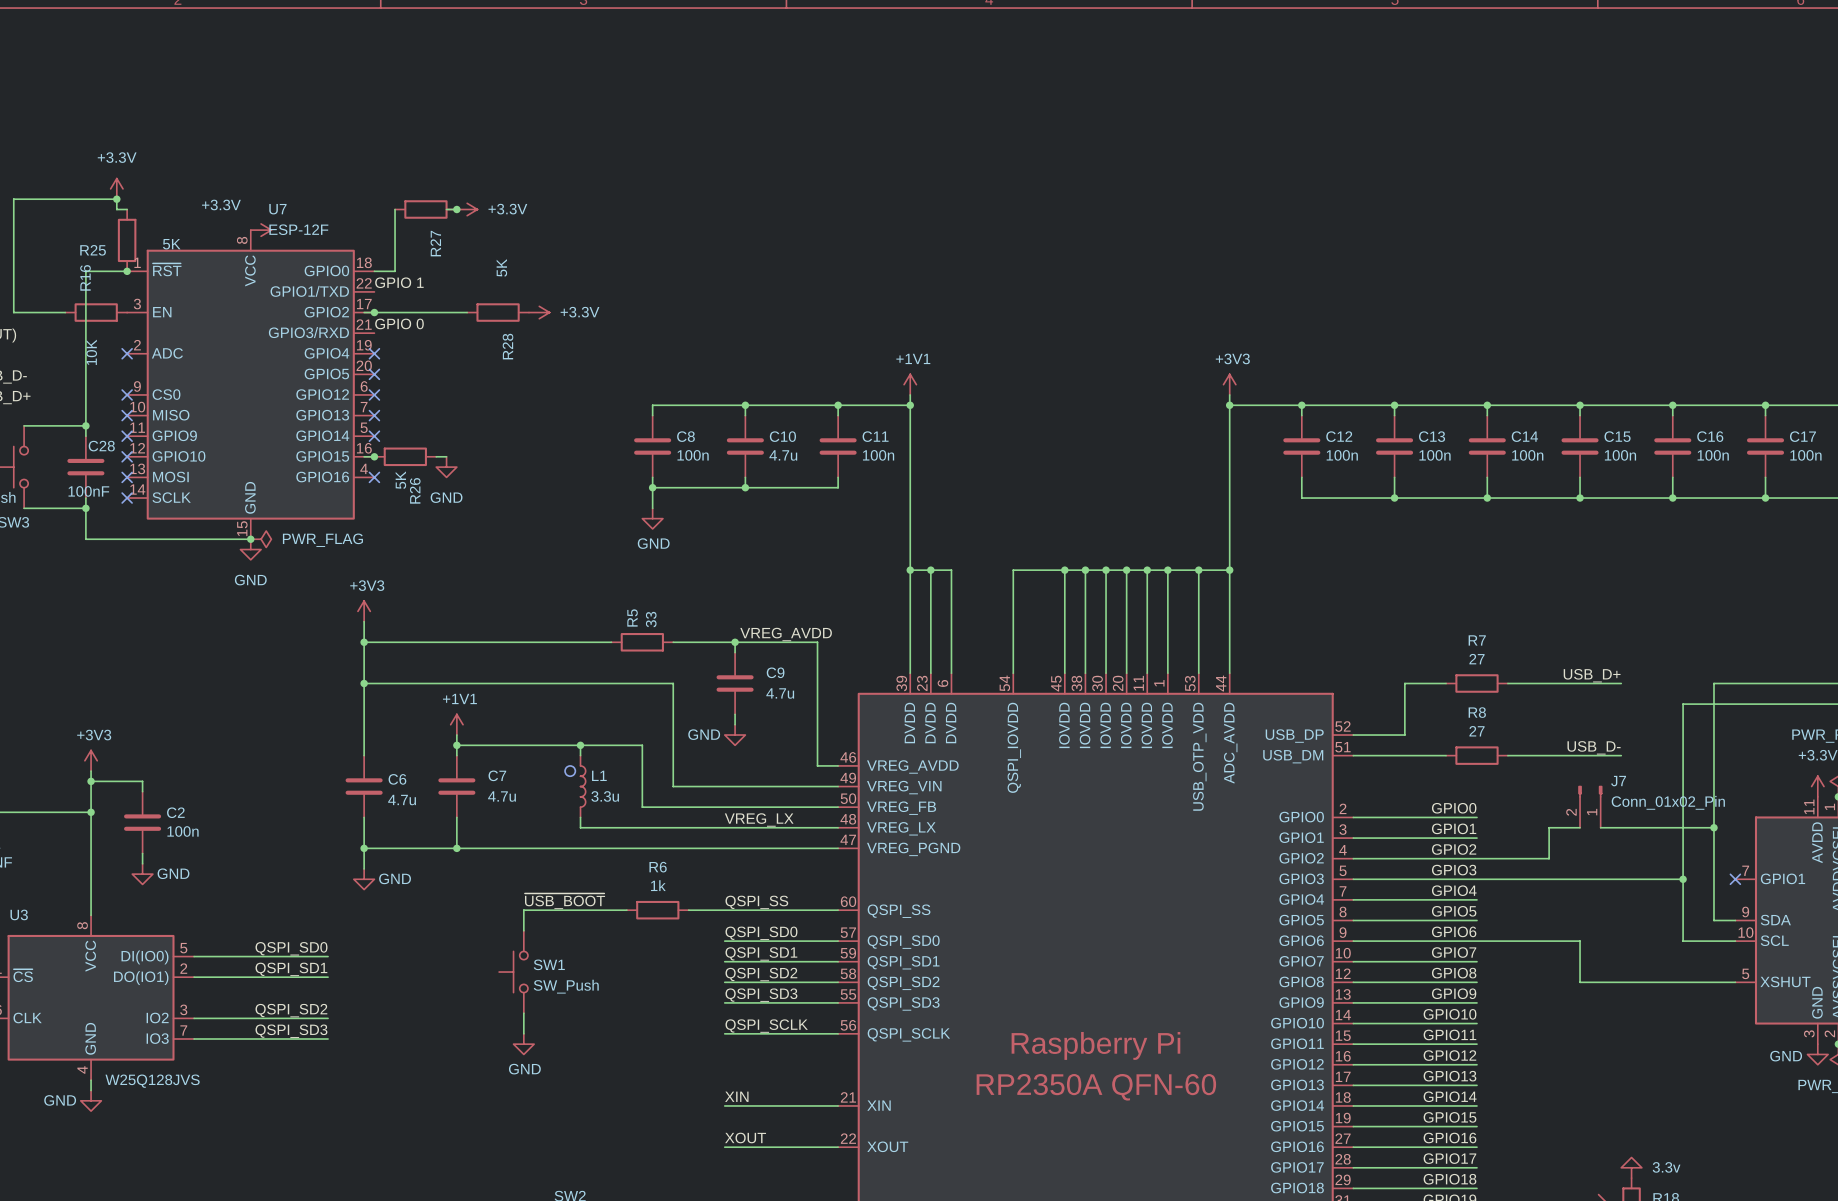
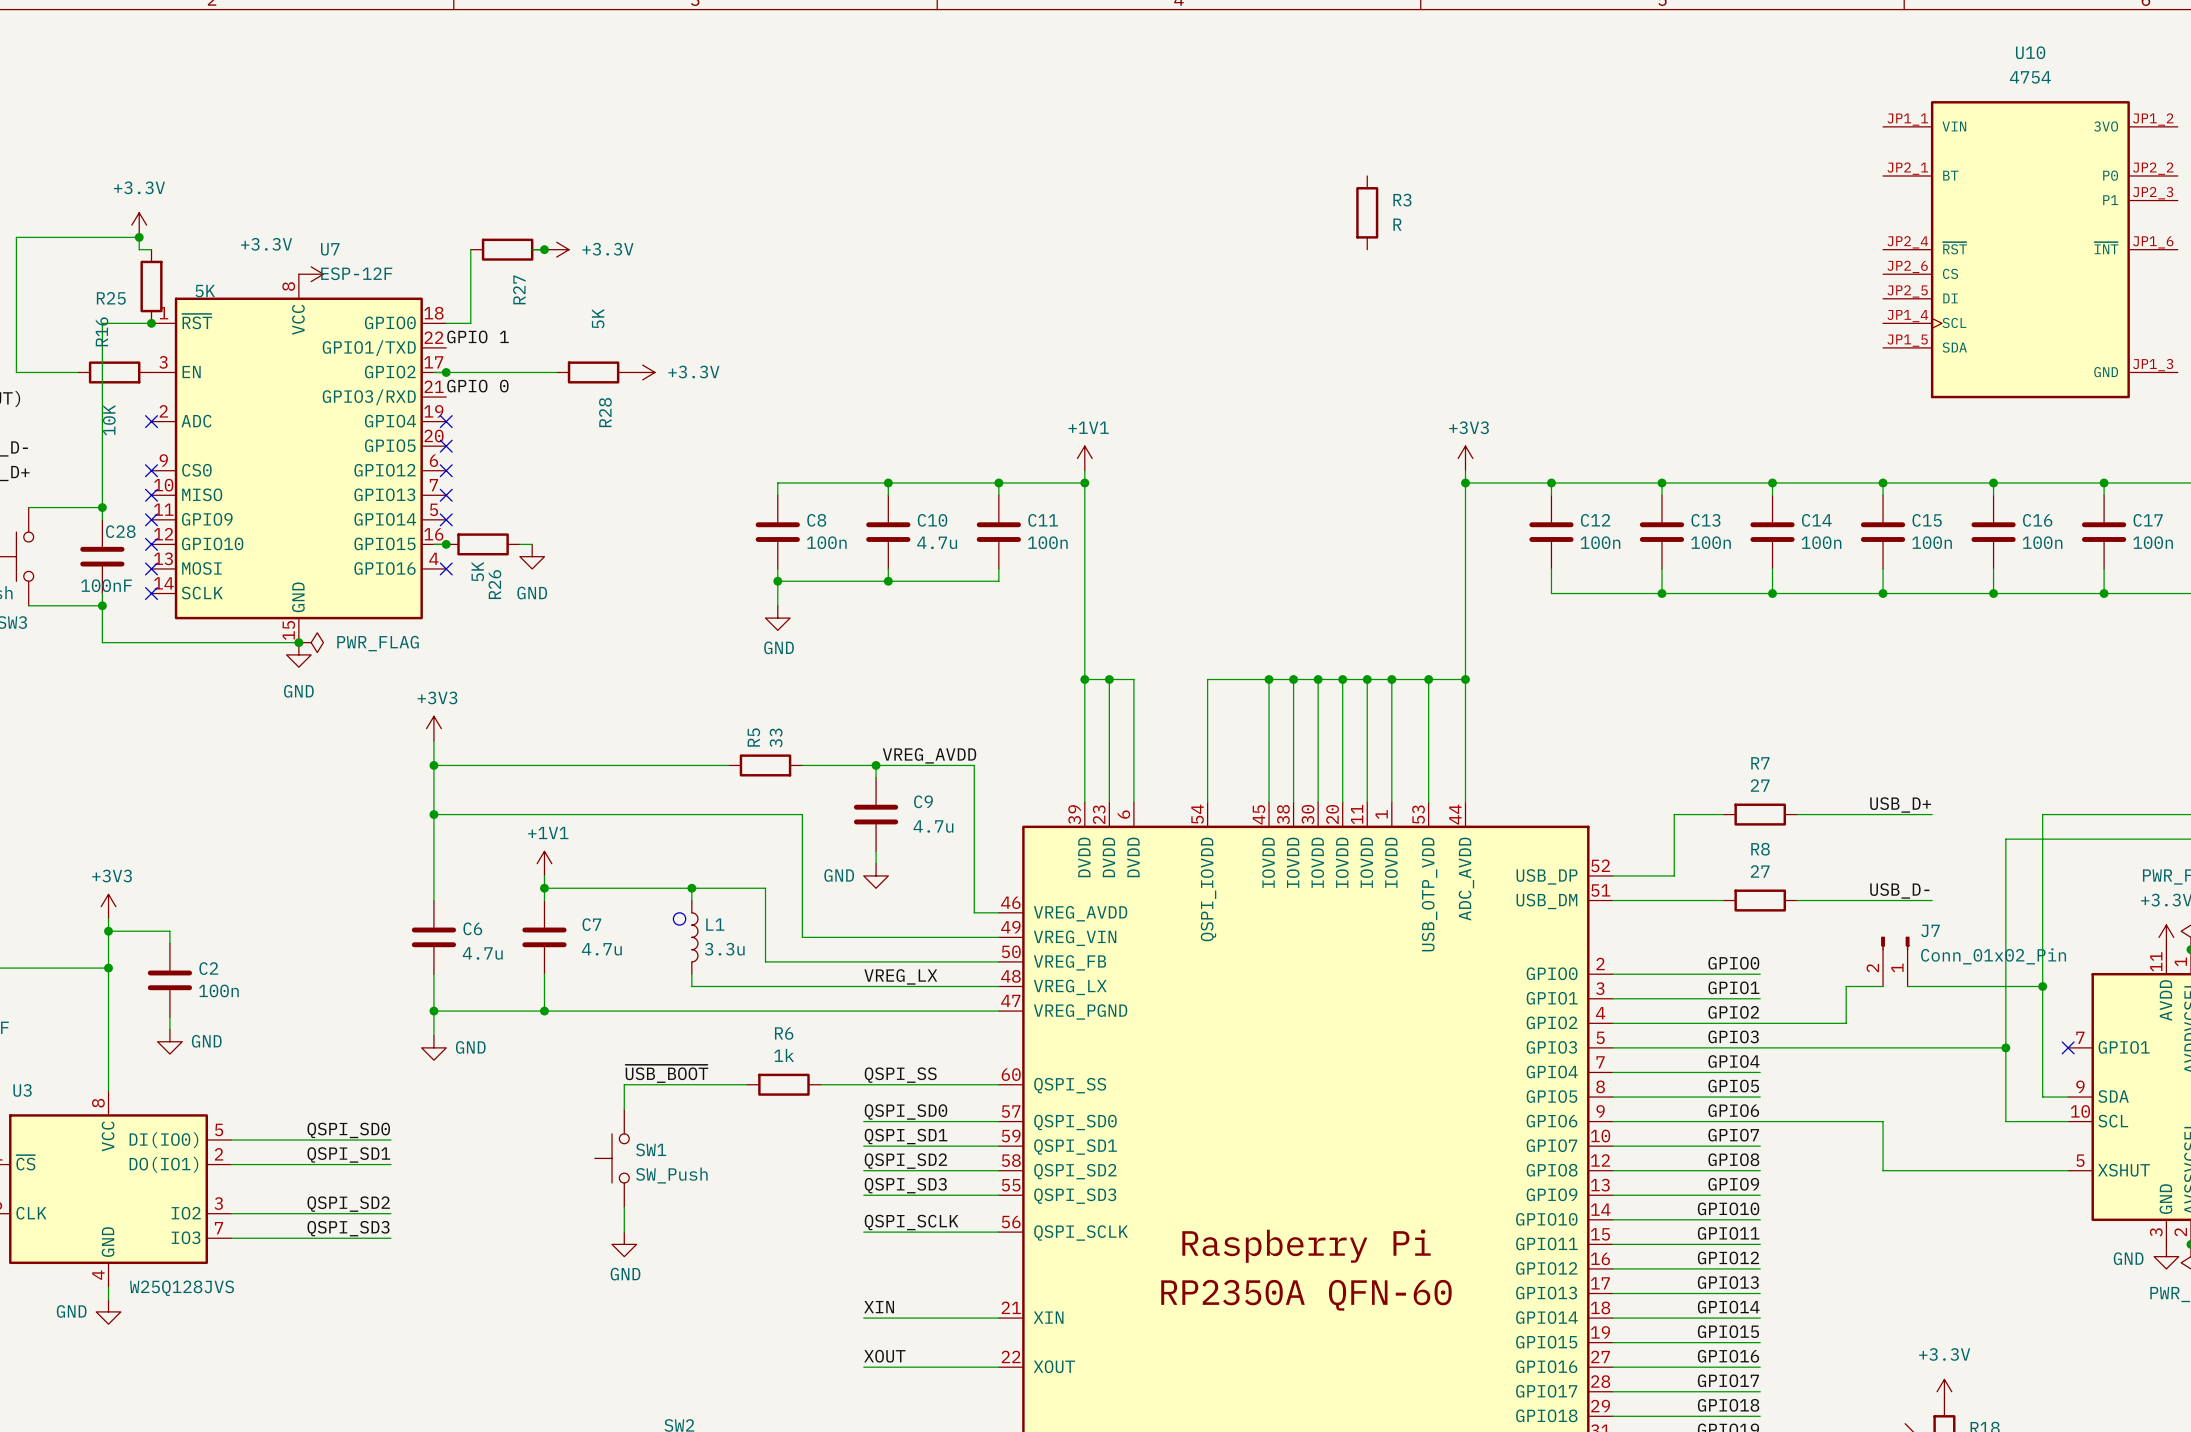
R3: none -> R (1367, 212)
U10: none -> 4754 (2030, 249)
power symbol: 3.3v (1631, 1167) -> +3.3V (1944, 1391)

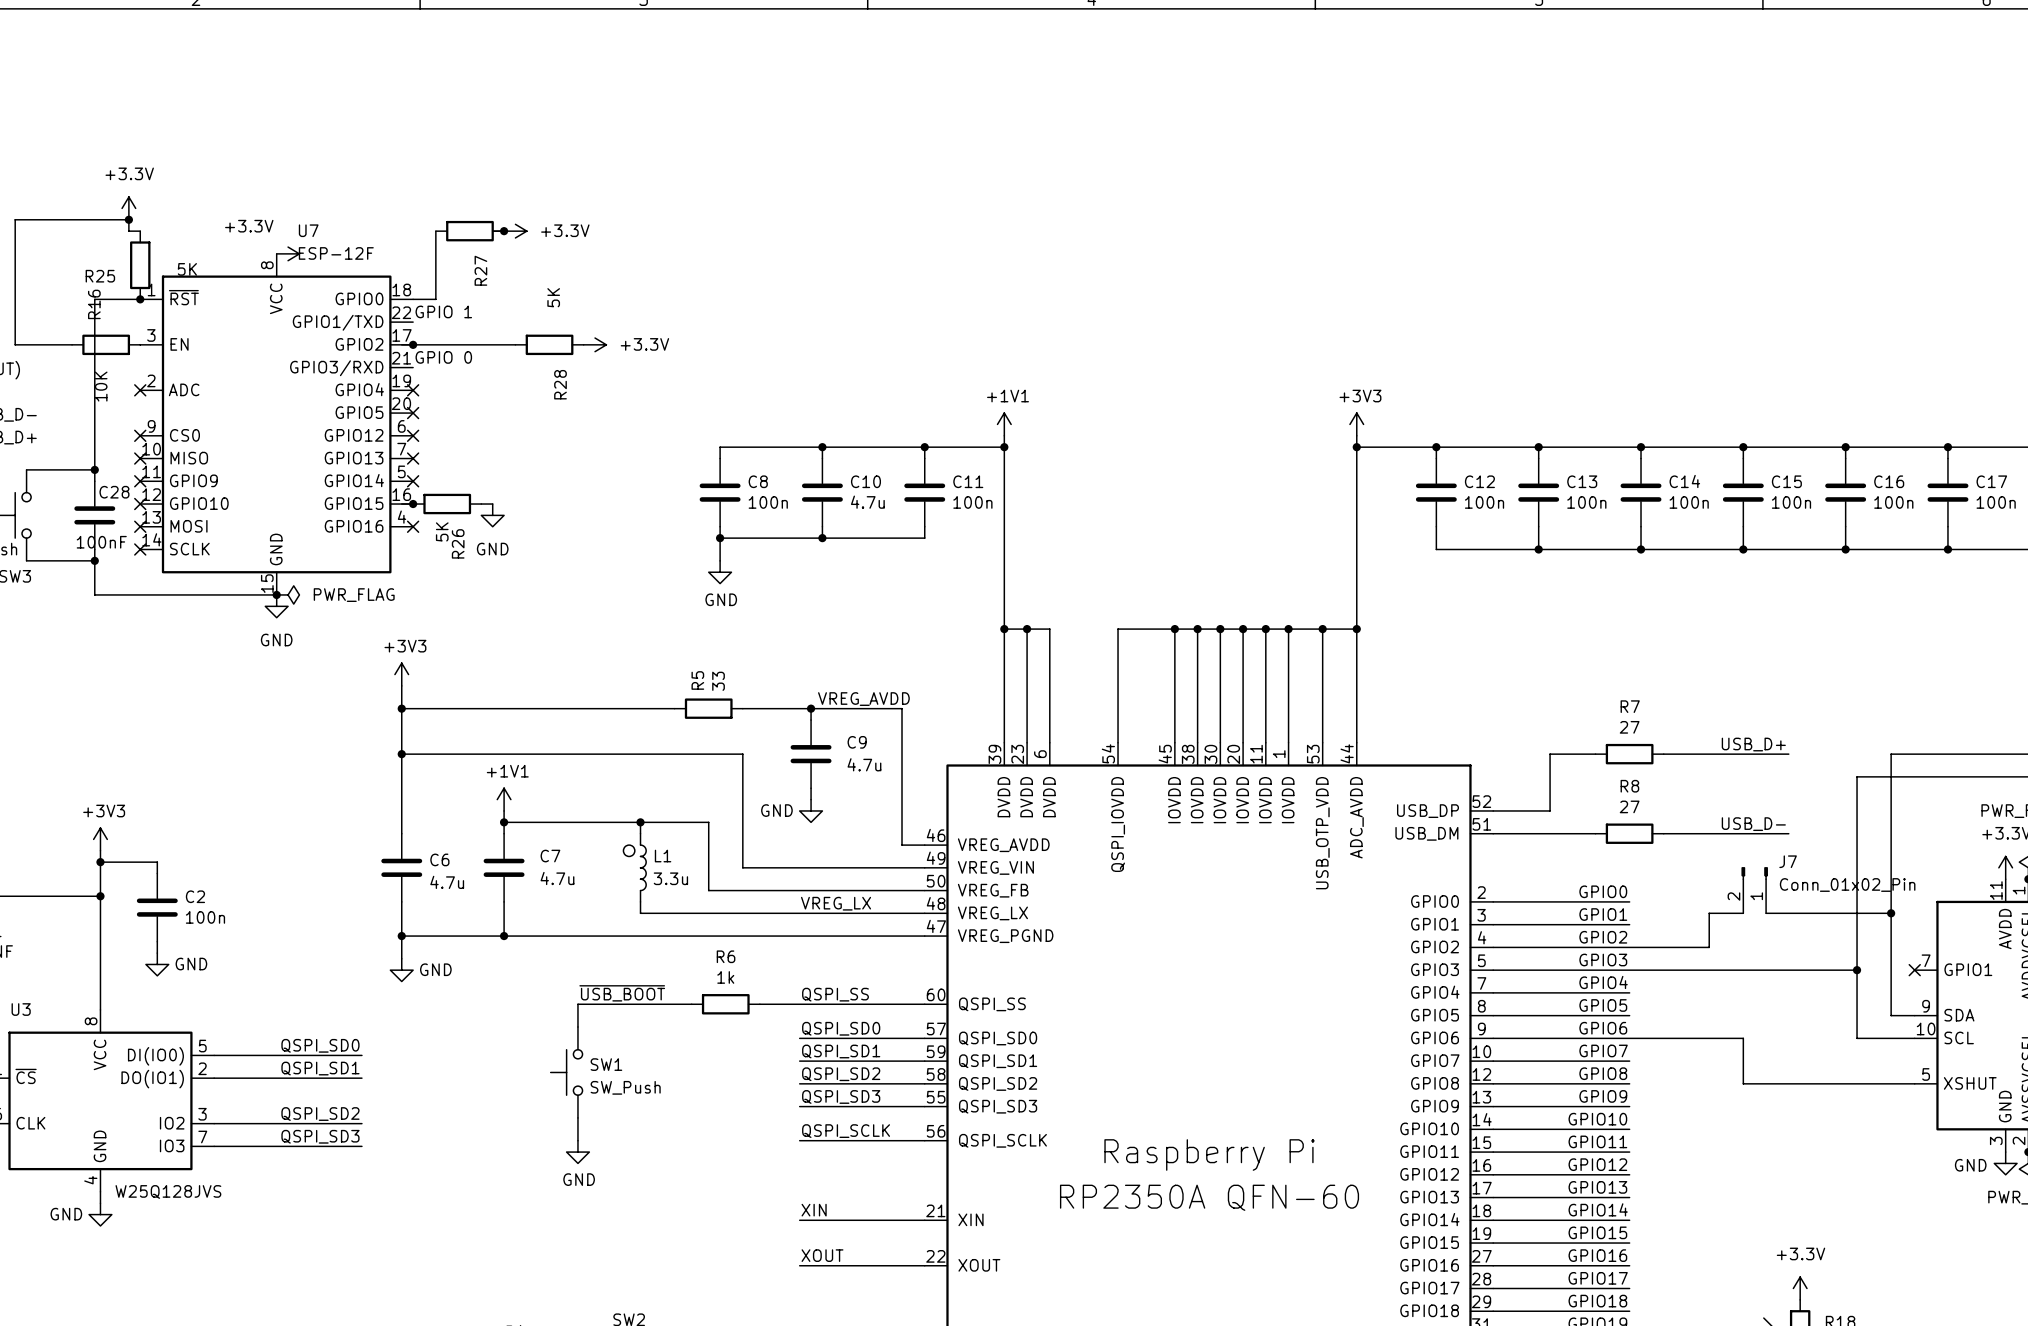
R3: R (1367, 212) -> none
U10: 4754 (2030, 249) -> none

